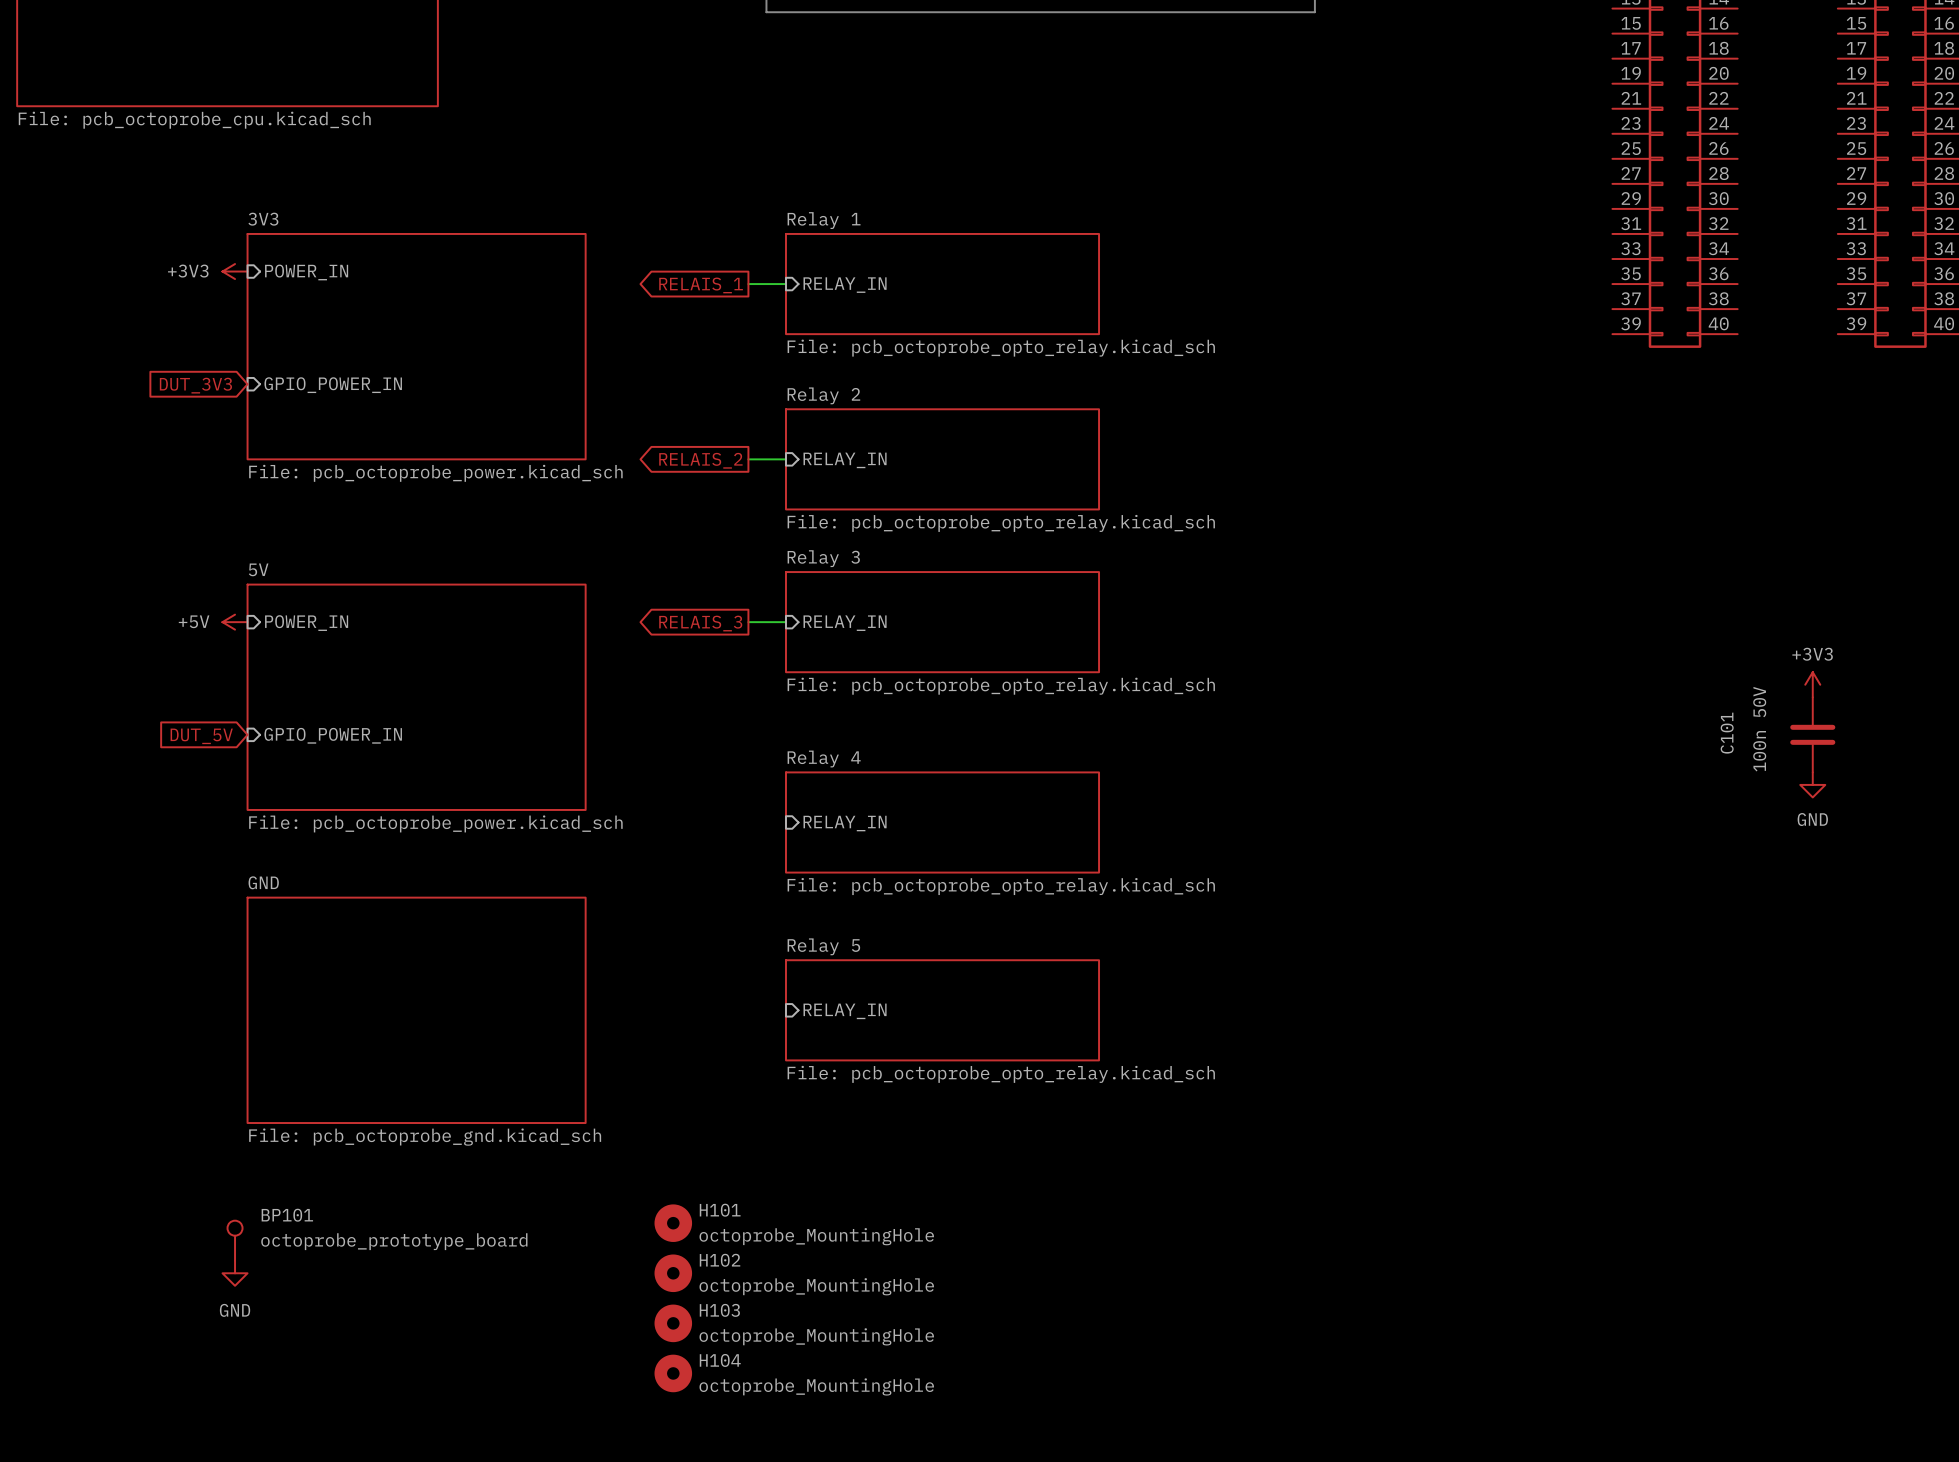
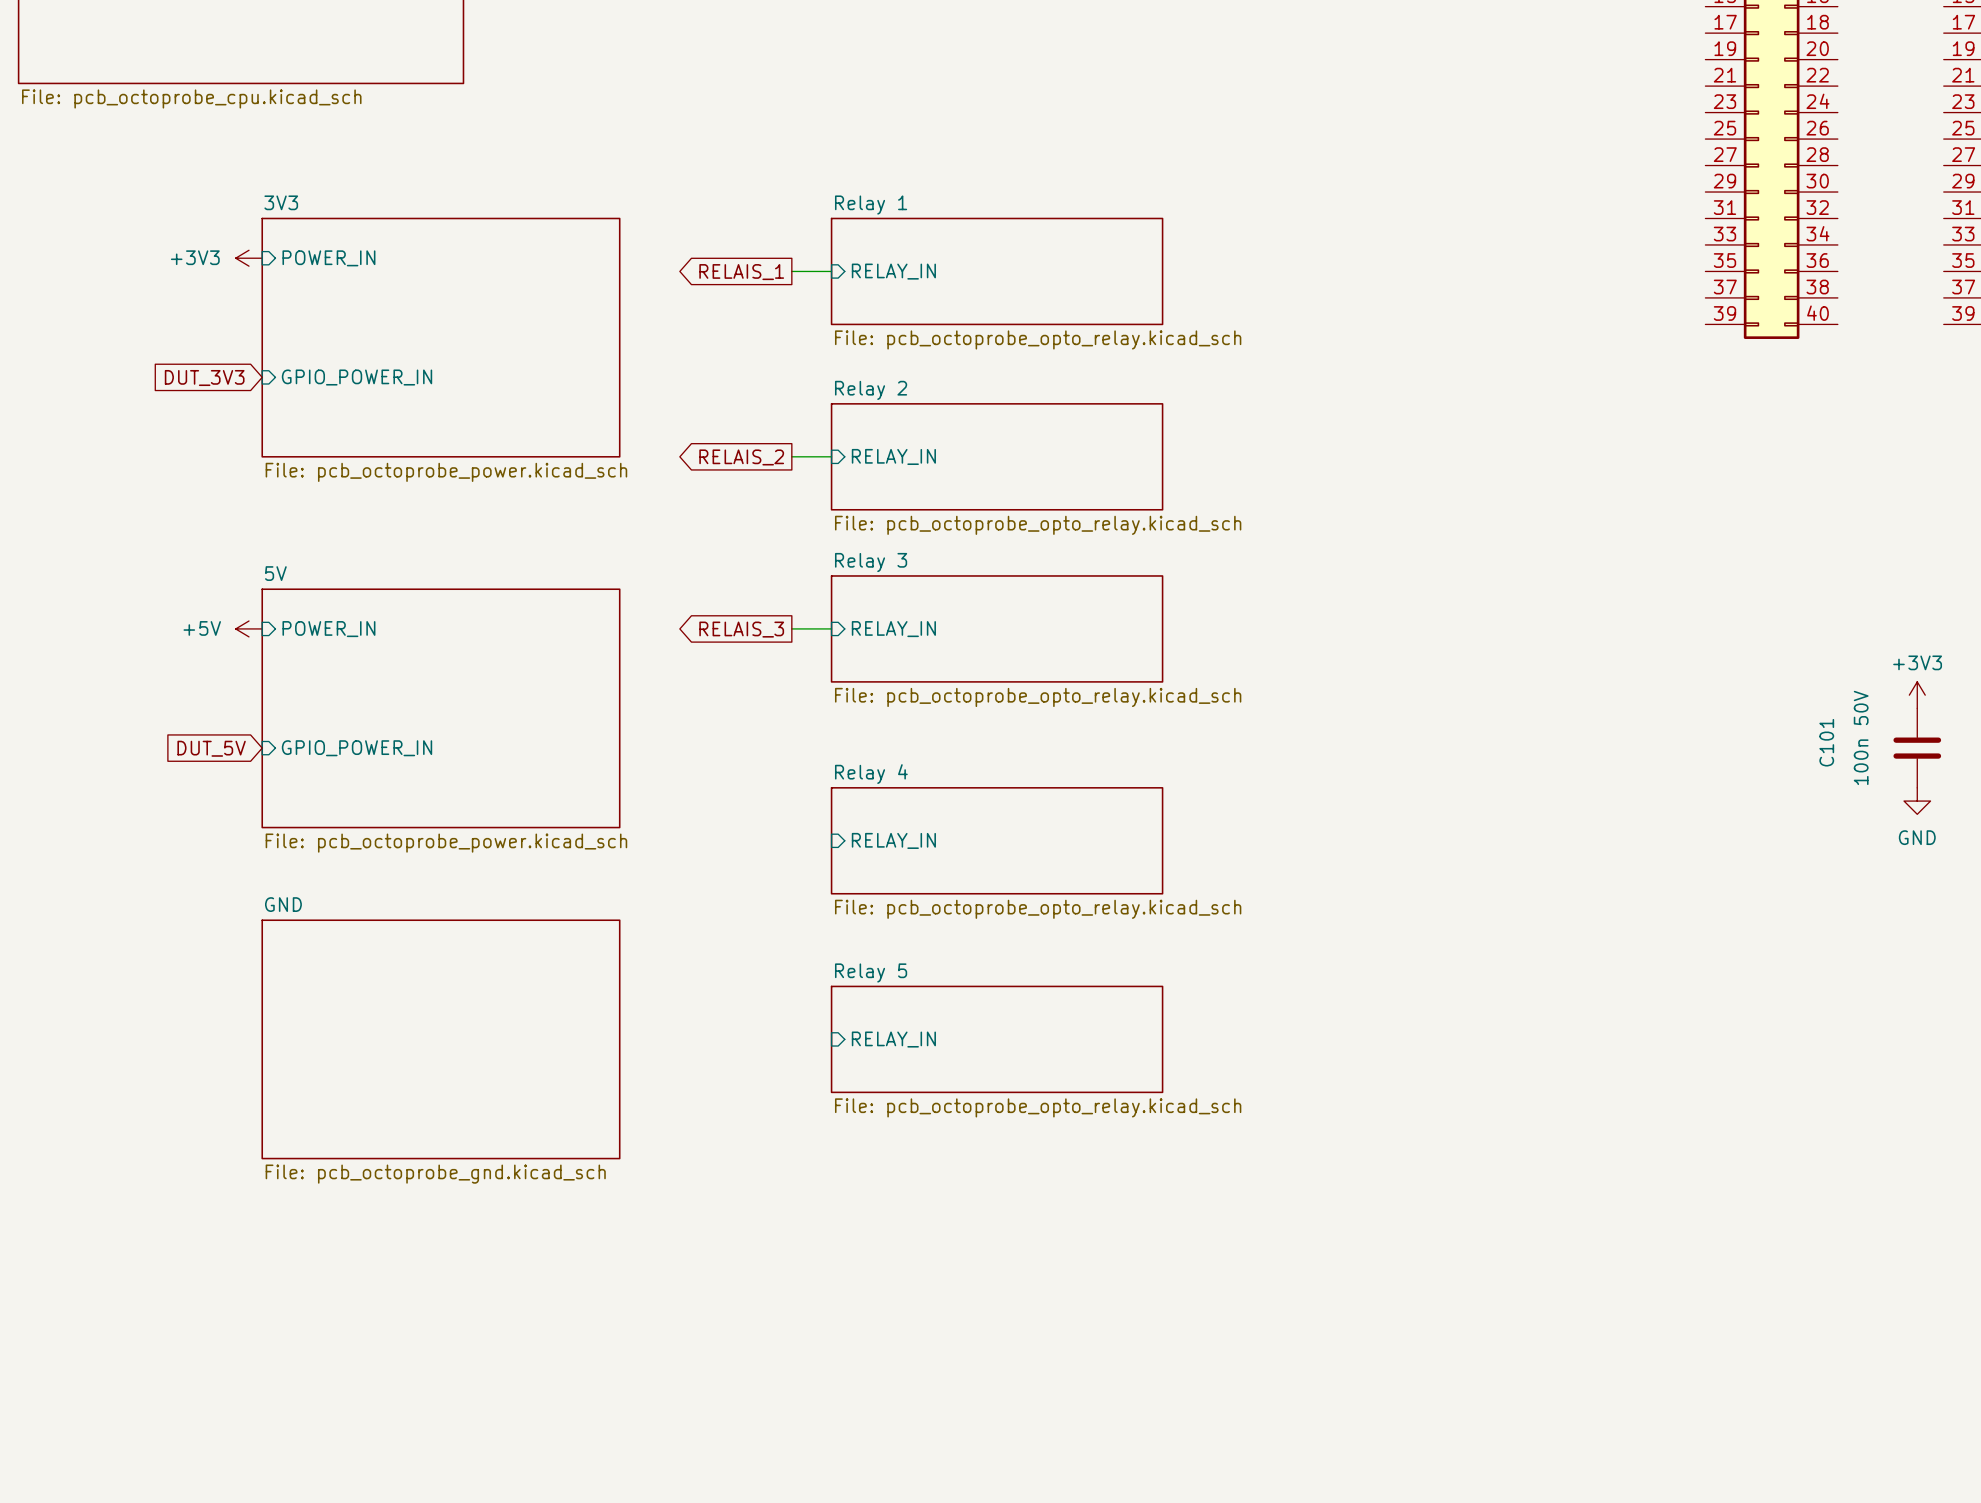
H101: octoprobe_MountingHole (673, 1223) -> none
BP101: octoprobe_prototype_board (235, 1240) -> none
power symbol: GND (235, 1273) -> none
H102: octoprobe_MountingHole (673, 1273) -> none
H103: octoprobe_MountingHole (673, 1323) -> none
H104: octoprobe_MountingHole (673, 1373) -> none

